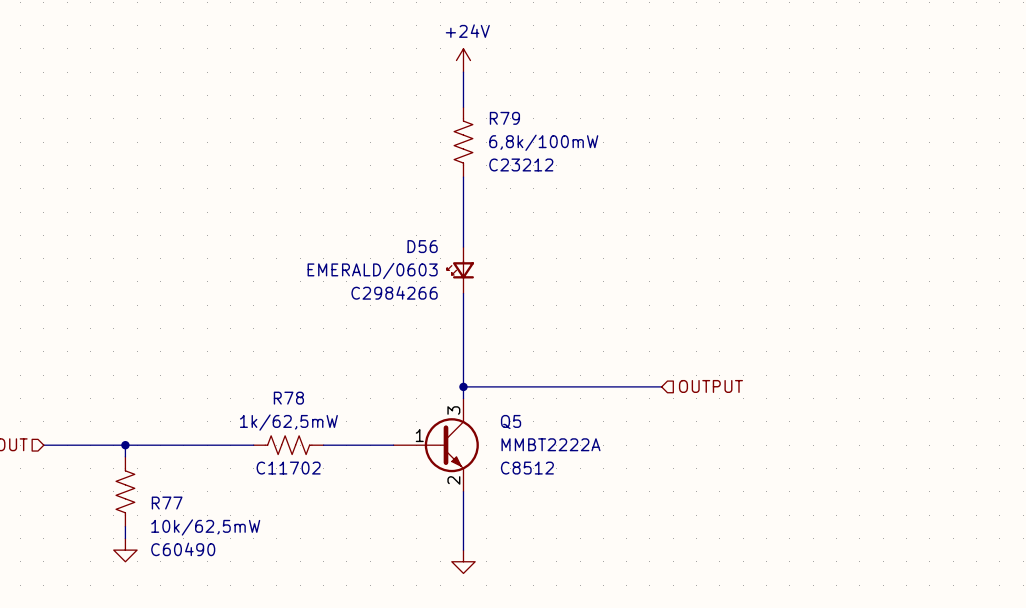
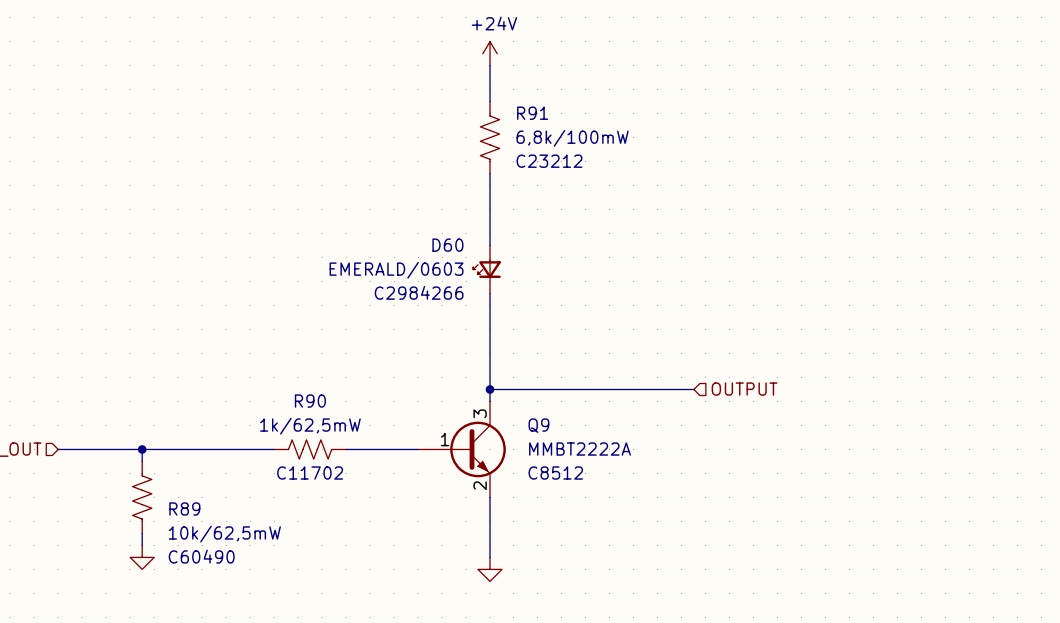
R79 name: R79 (504, 118) -> R91 (532, 113)
D56 name: D56 (422, 246) -> D60 (447, 245)
R78 name: R78 (288, 398) -> R90 (310, 401)
Q5 name: Q5 (511, 422) -> Q9 (538, 425)
R77 name: R77 (167, 503) -> R89 (184, 508)

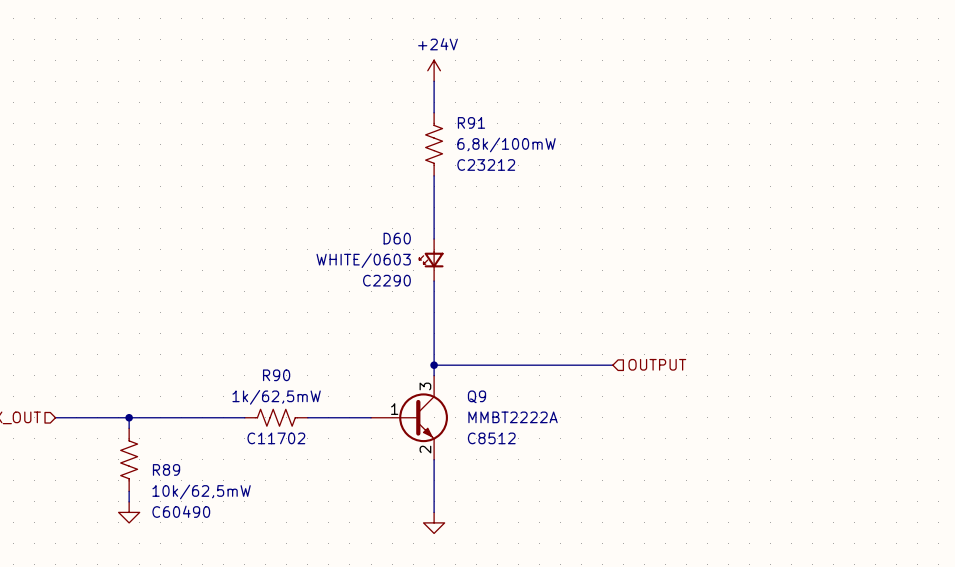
D60 value: EMERALD/0603 (396, 270) -> WHITE/0603 (363, 260)
D60 text: C2984266 (419, 292) -> C2290 (386, 280)

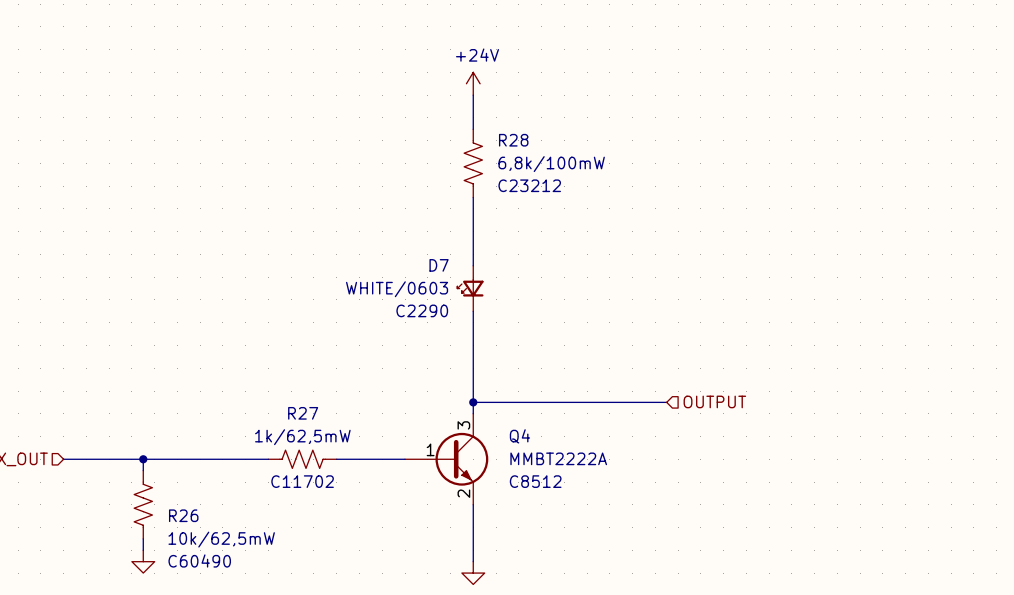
R91 name: R91 (471, 122) -> R28 (513, 140)
D60 name: D60 (397, 238) -> D7 (439, 265)
R90 name: R90 (276, 375) -> R27 (303, 413)
Q9 name: Q9 (476, 396) -> Q4 (519, 436)
R89 name: R89 (166, 469) -> R26 (183, 515)

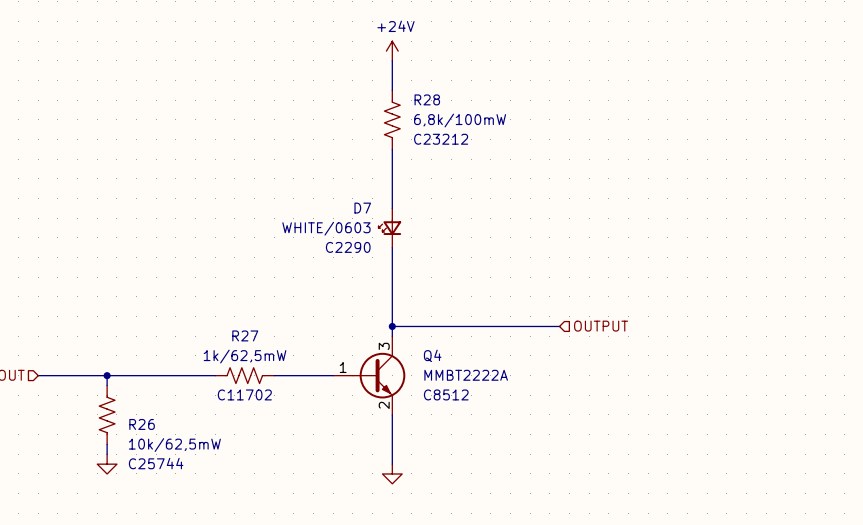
Q4 symbol: [405, 413, 489, 505] -> [333, 336, 406, 415]
R26 text: C60490 (199, 560) -> C25744 (156, 463)

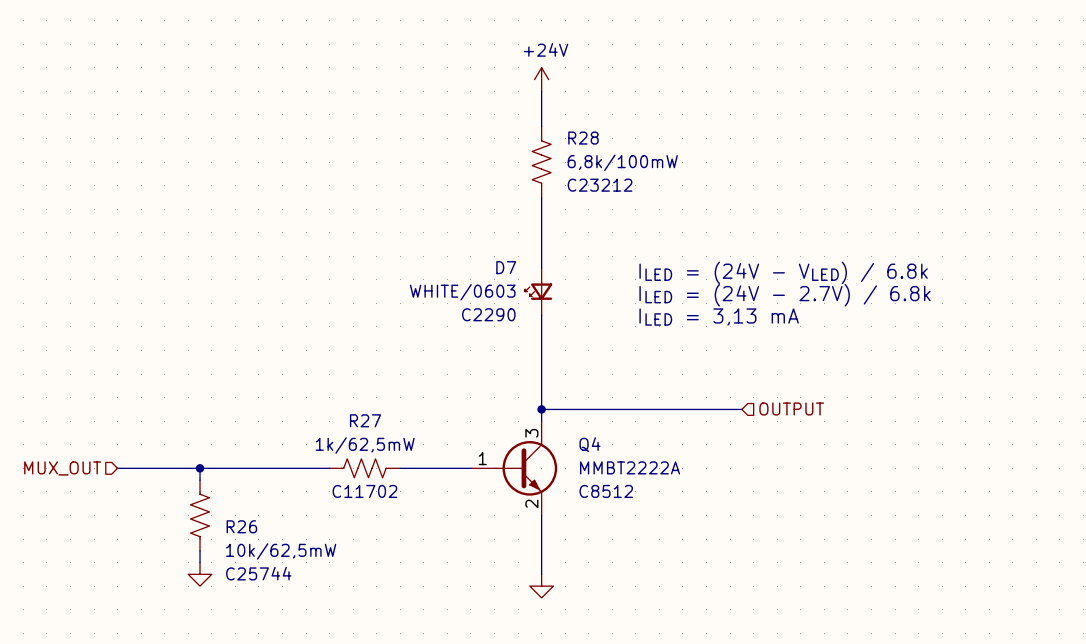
text: none -> ILED = (24V - VLED) / 6.8k (783, 272)
text: none -> ILED = (24V - 2.7V) / 6.8k (785, 295)
text: none -> ILED = 3,13 mA (719, 317)

